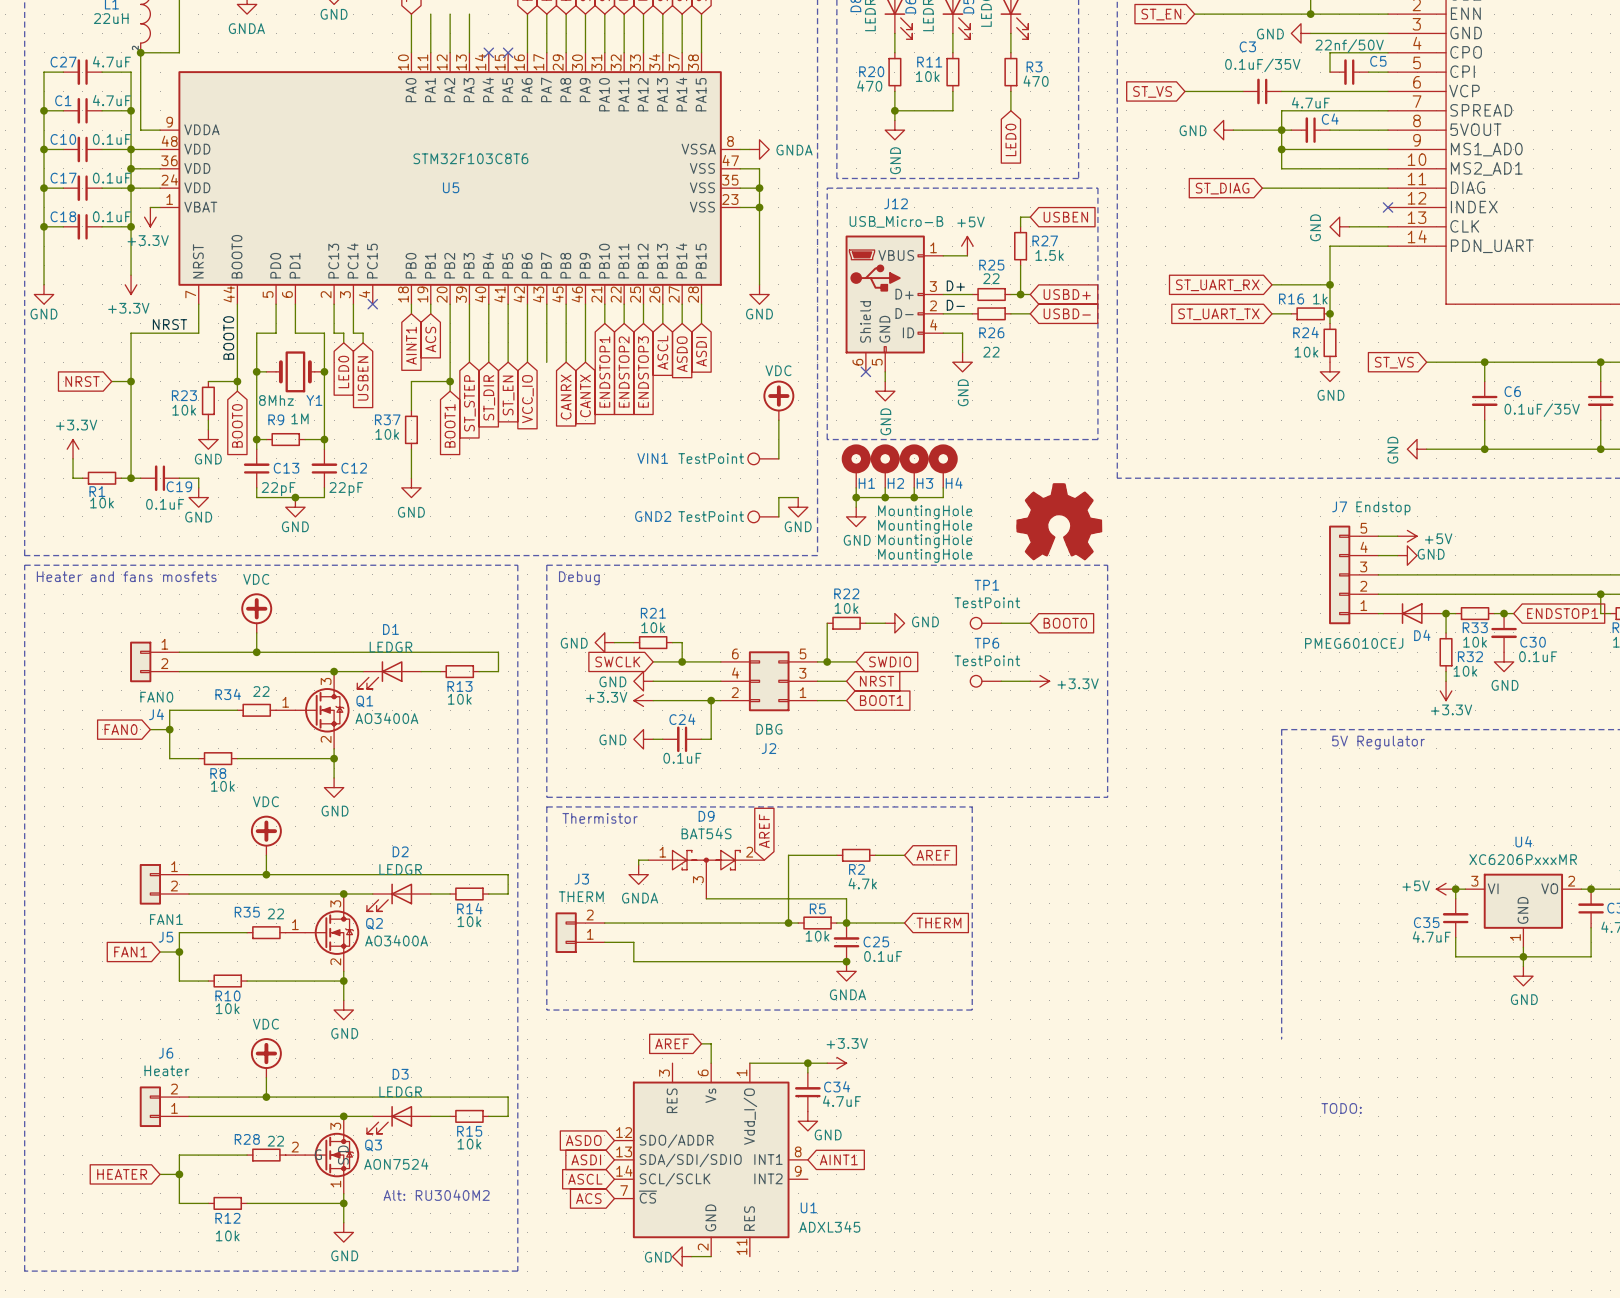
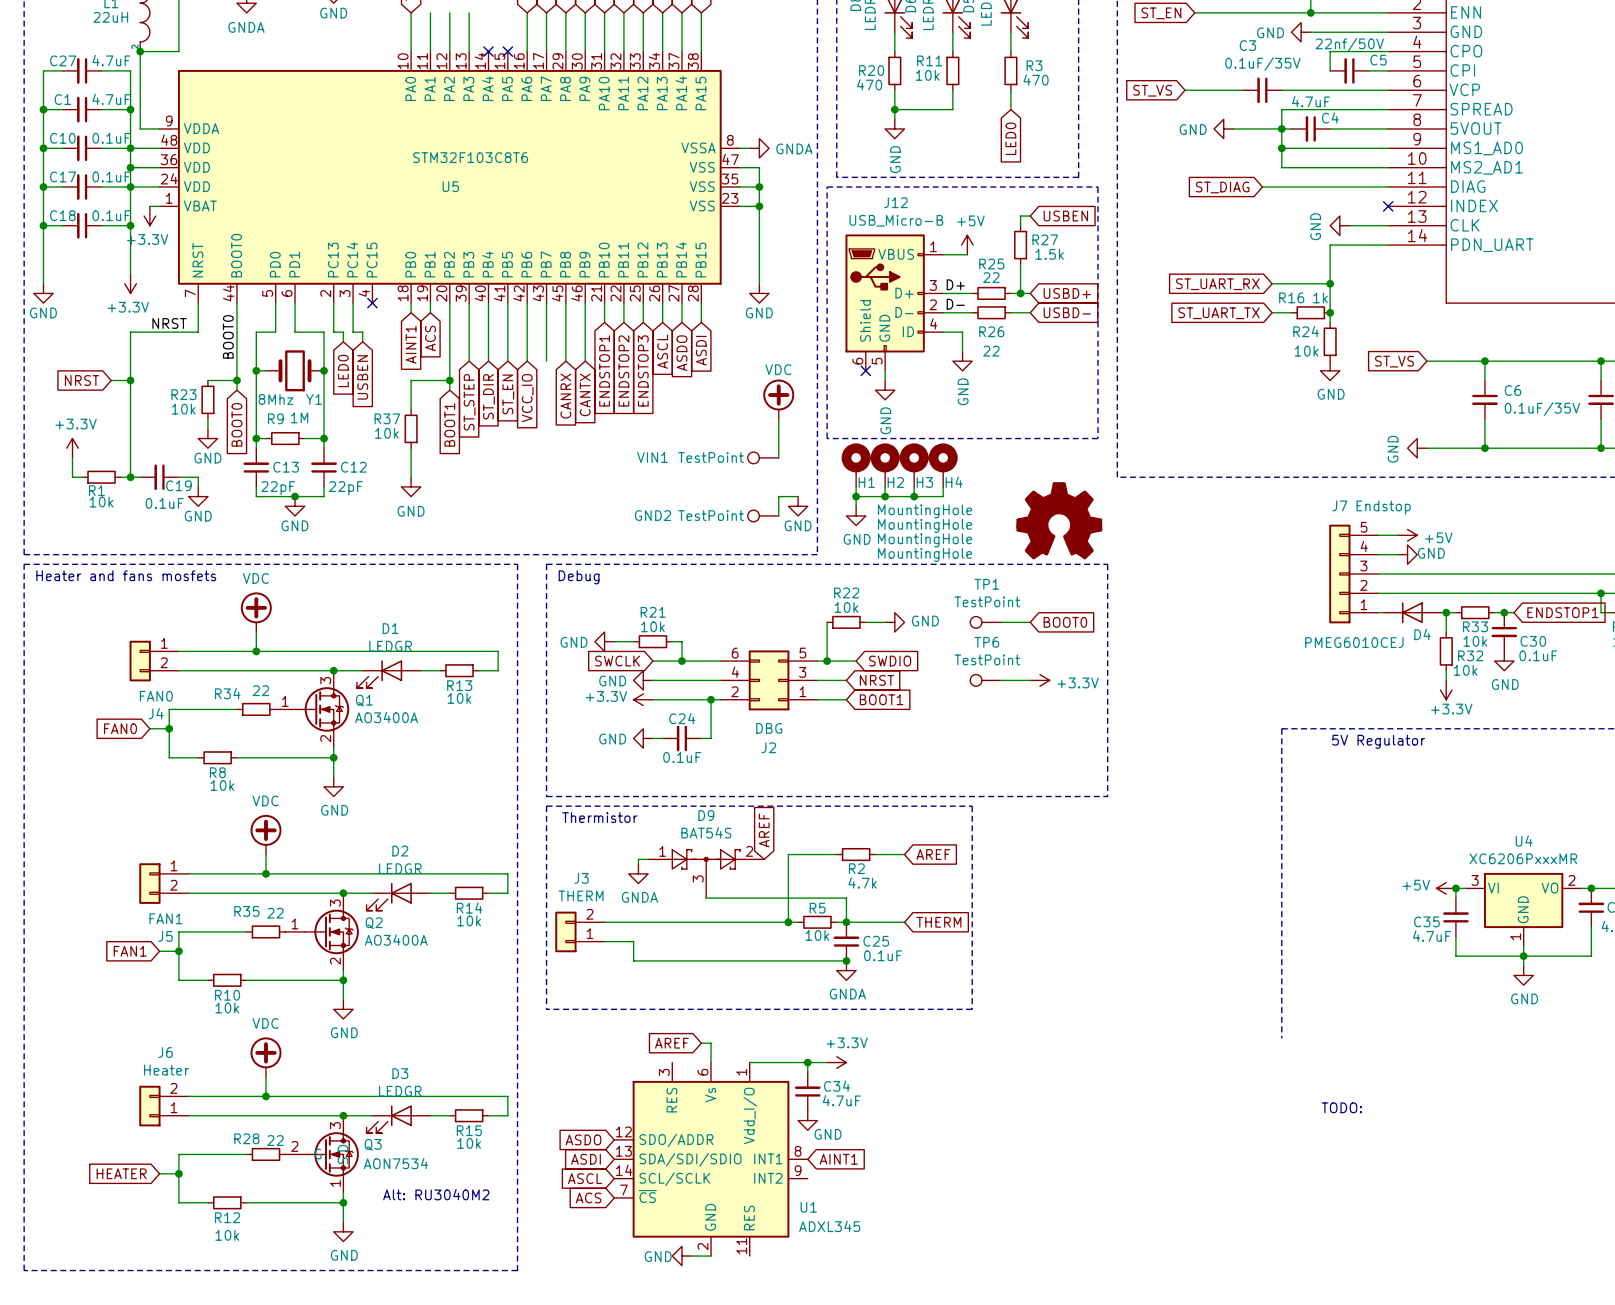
Q3 value: AON7524 (396, 1164) -> AON7534 (395, 1163)

